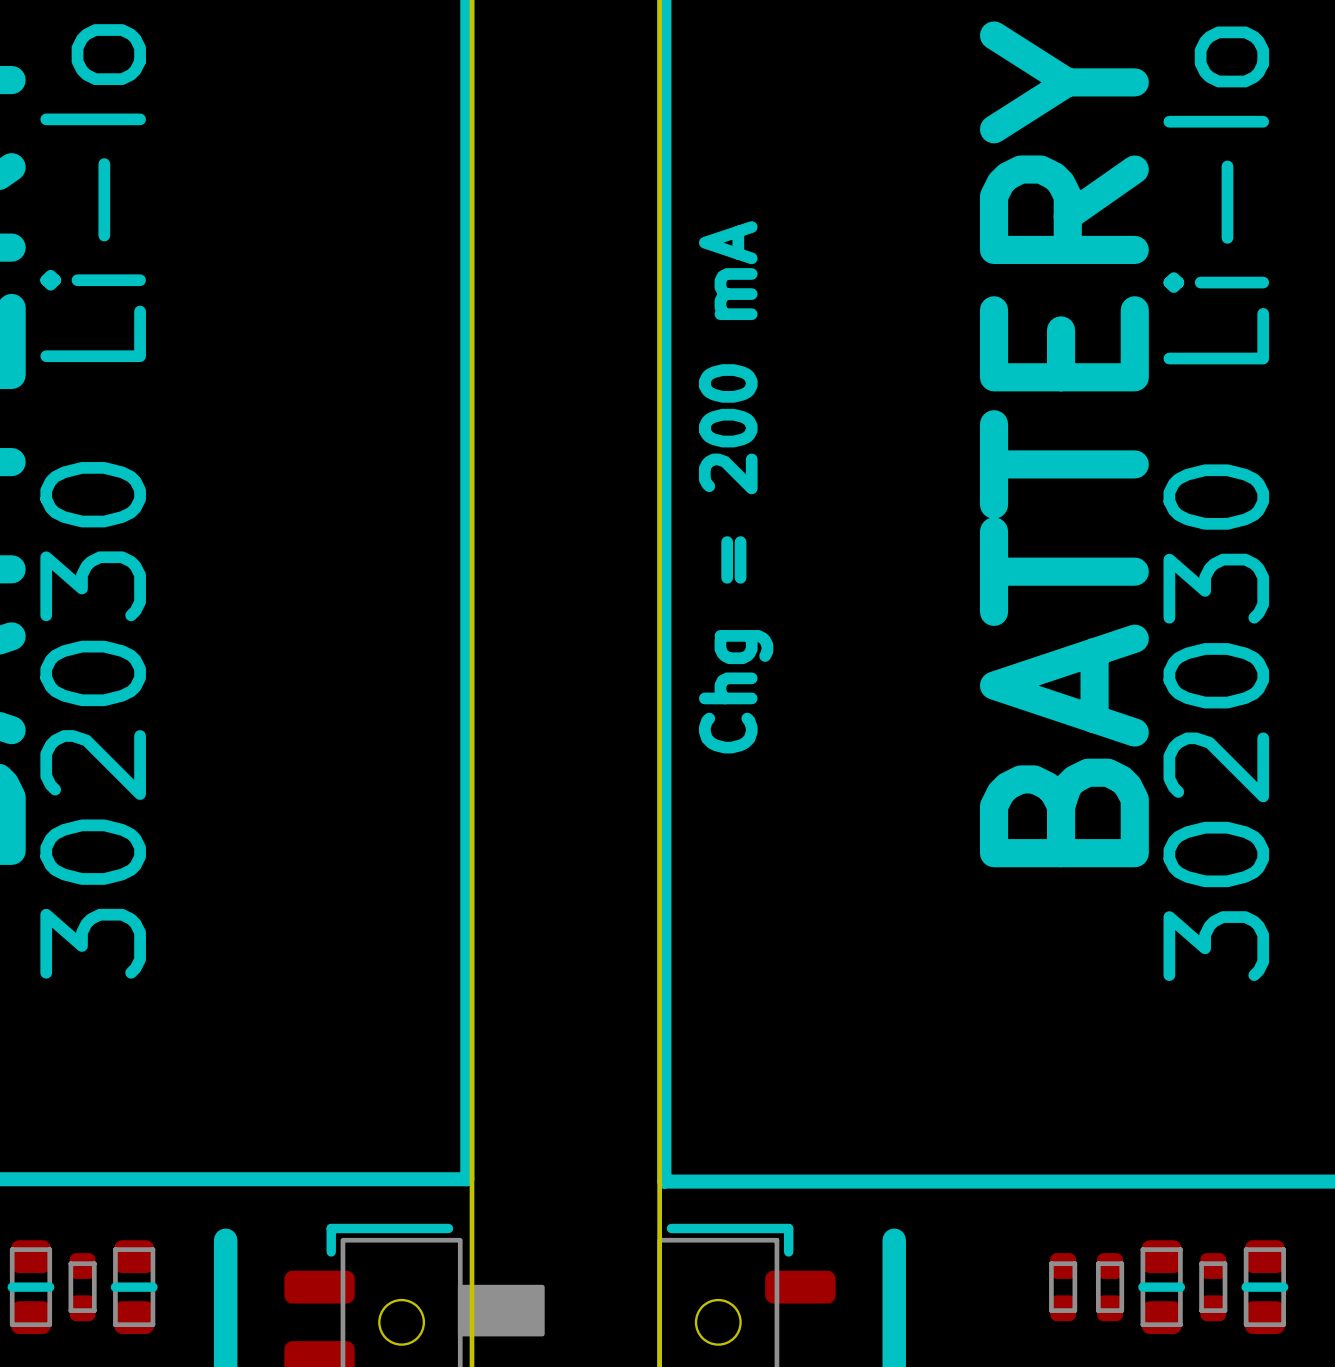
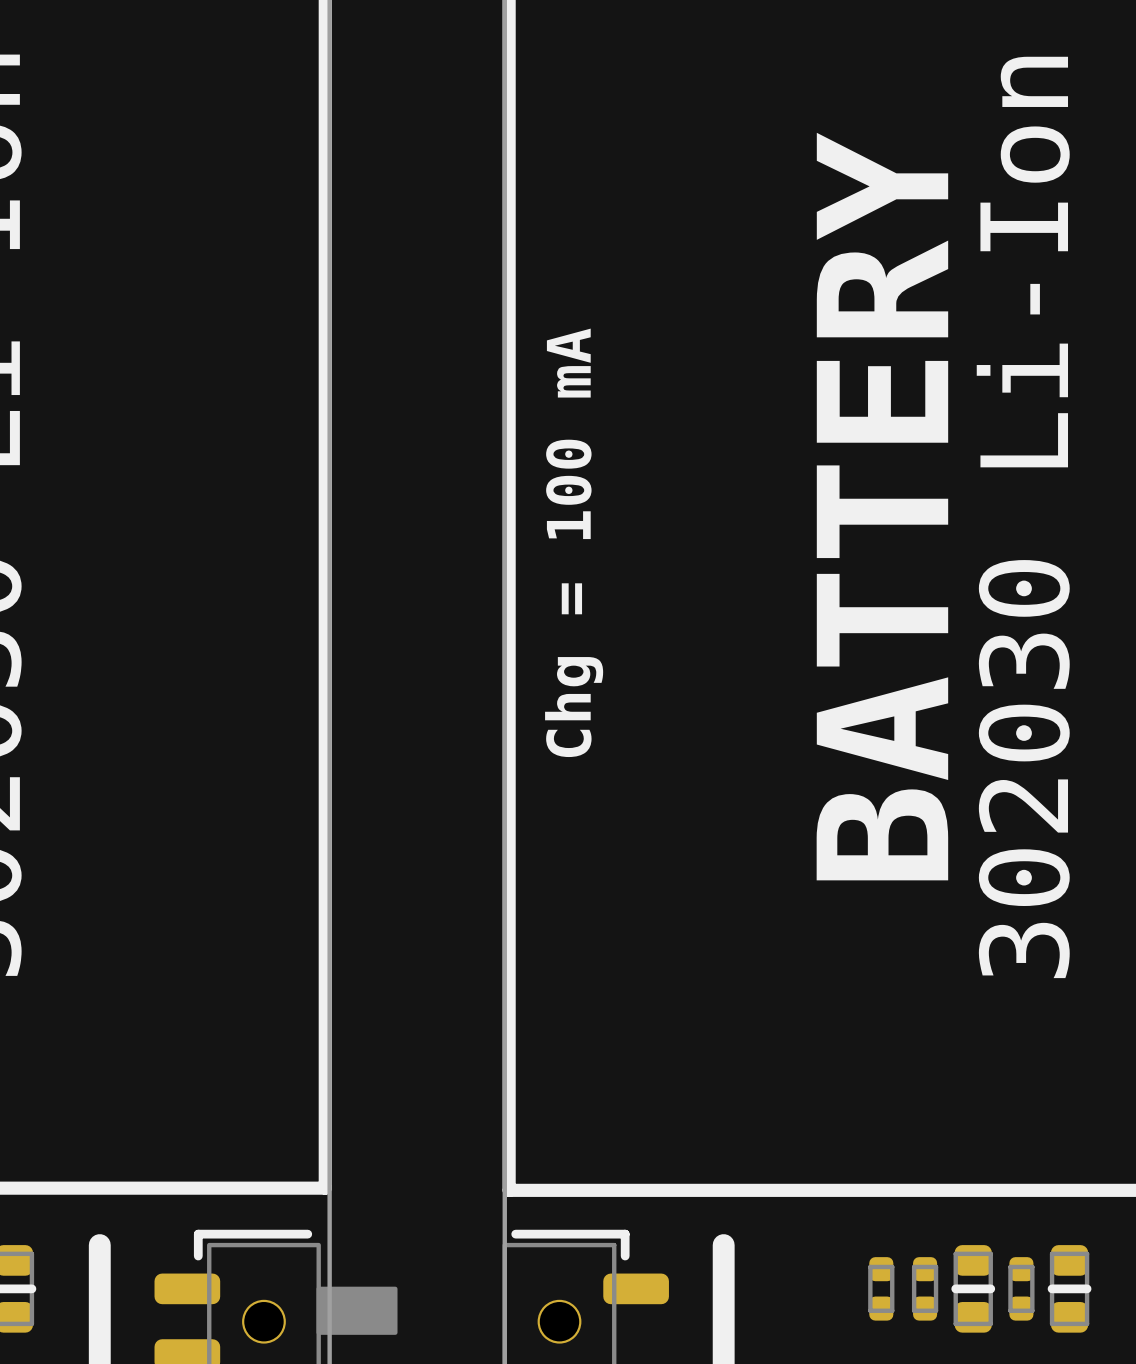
text: Chg = 200 mA (736, 487) -> Chg = 100 mA (574, 542)

